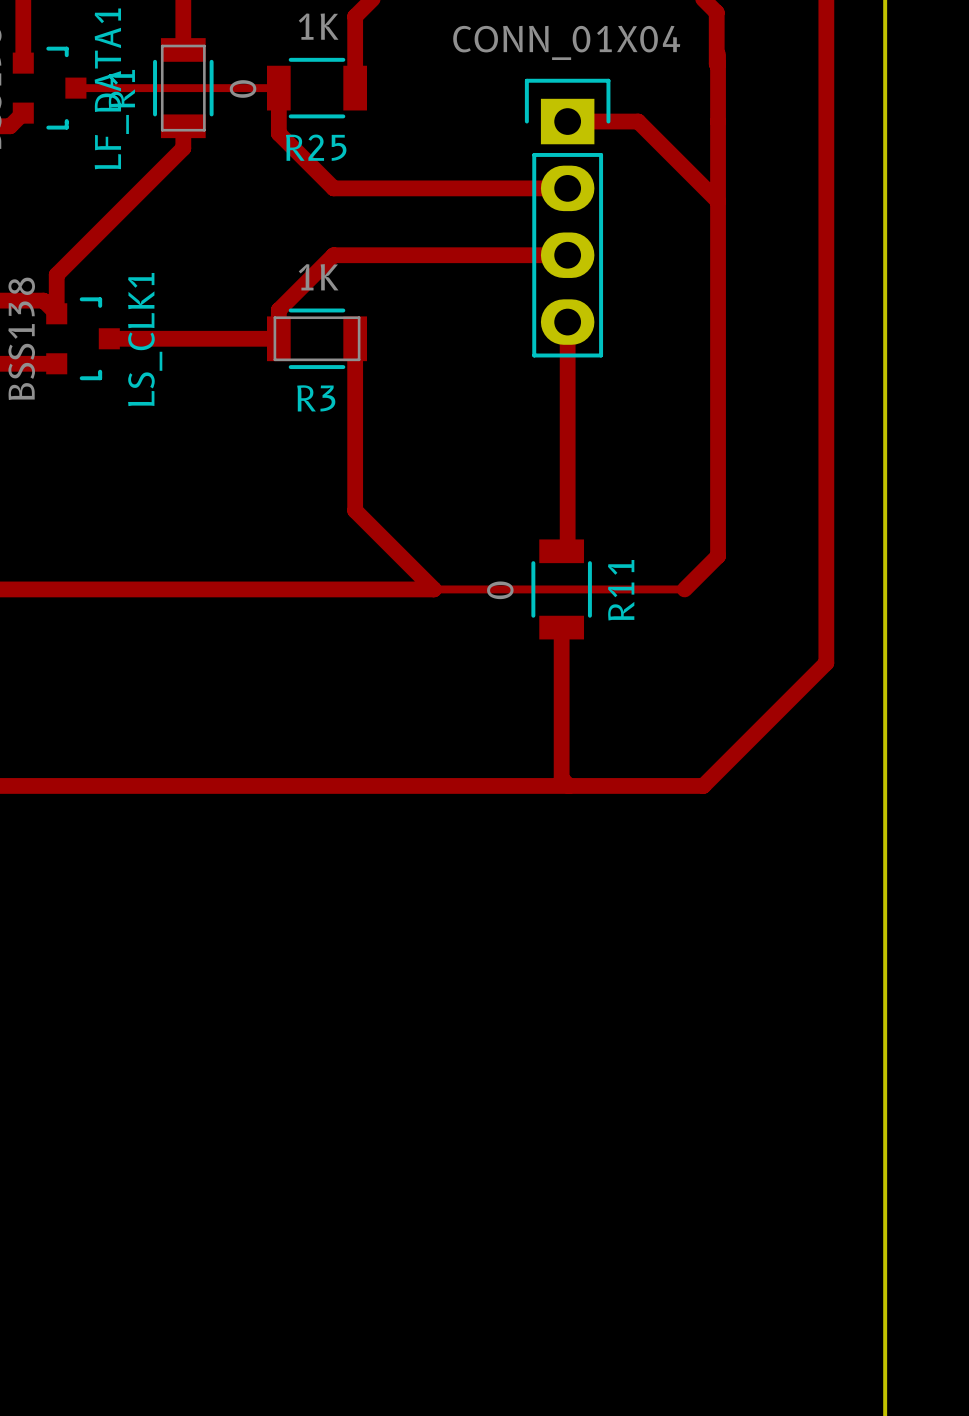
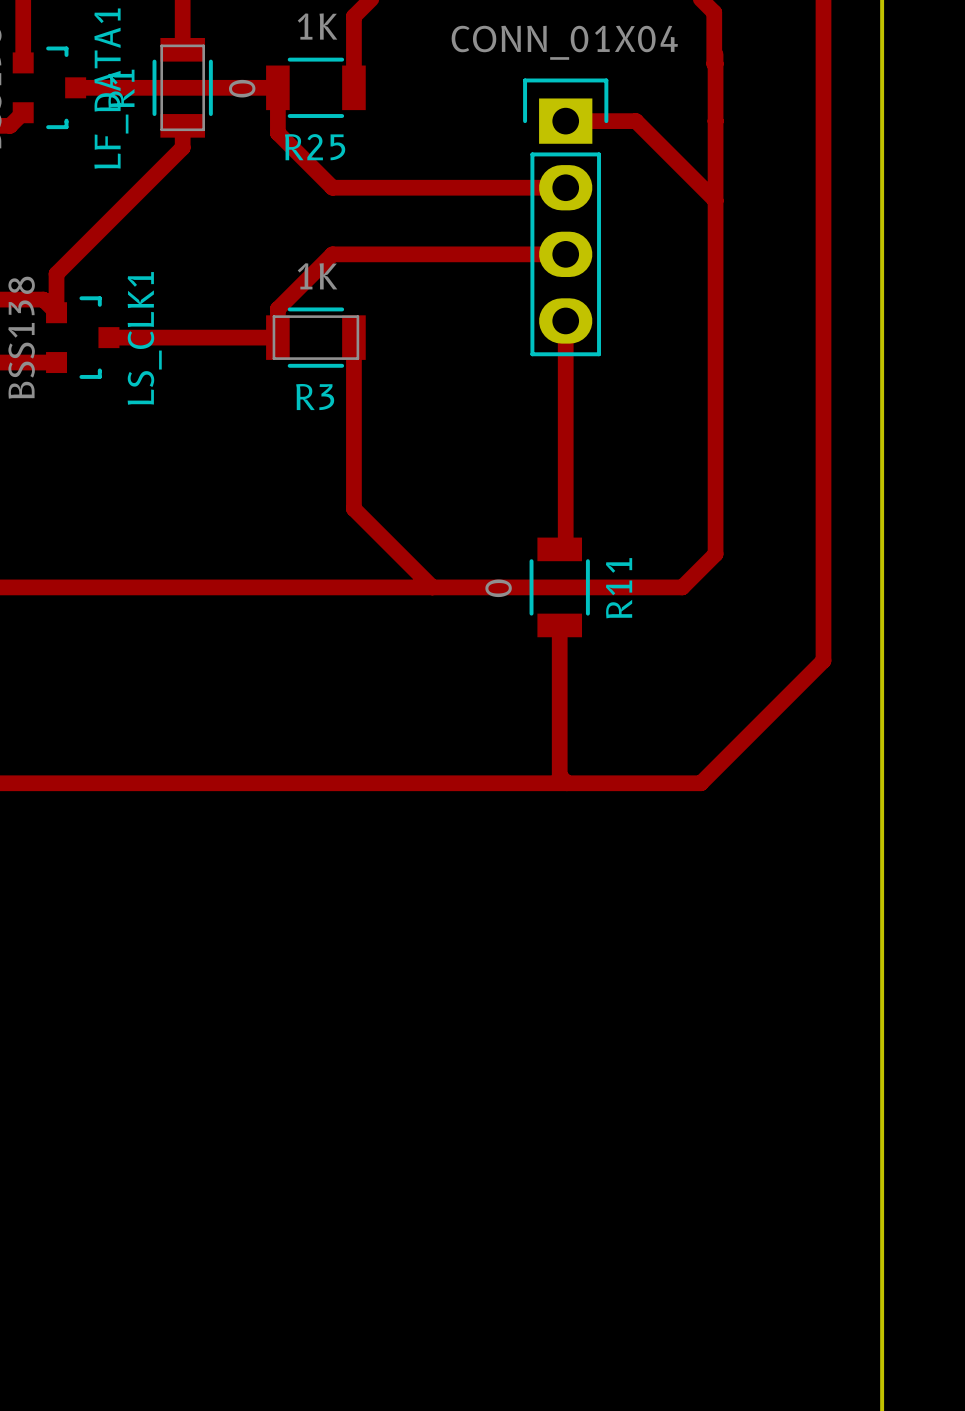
track width: thin (75, 88) (278, 88) -> thick (75, 87) (277, 87)
track width: thin (433, 589) (684, 589) -> thick (432, 587) (682, 587)

